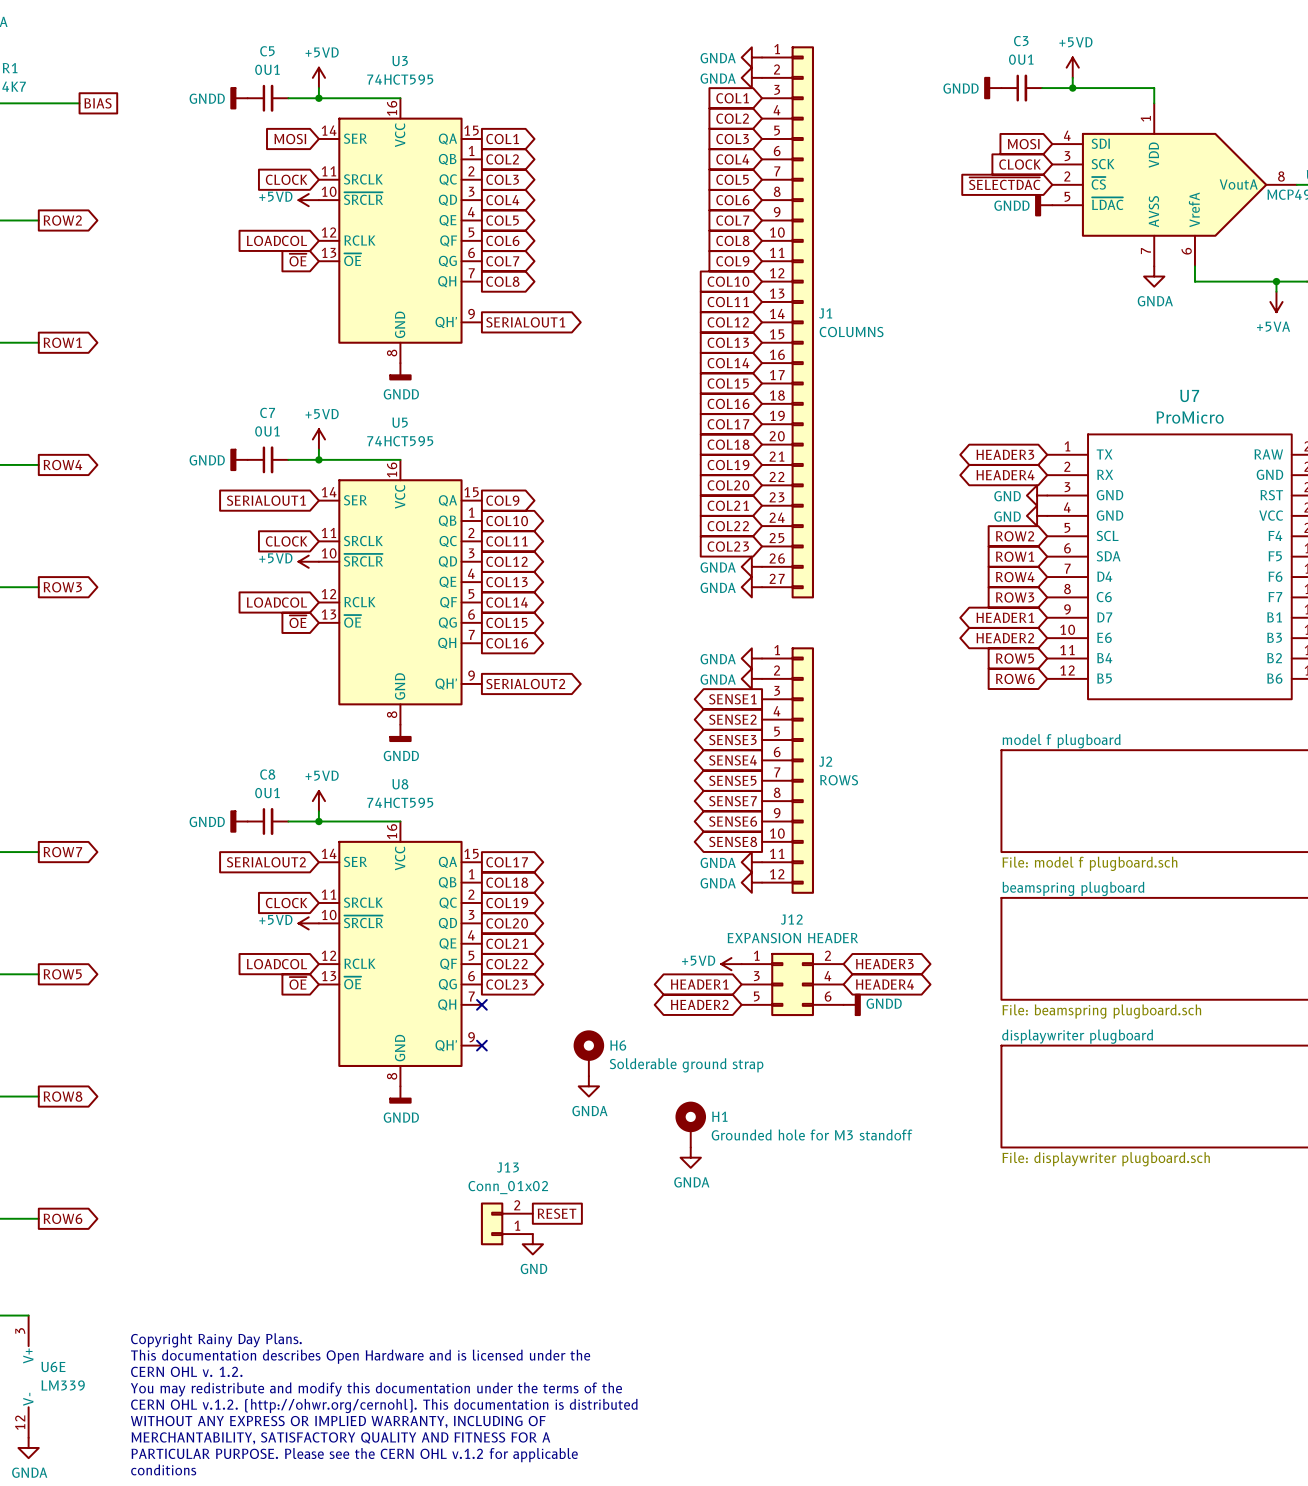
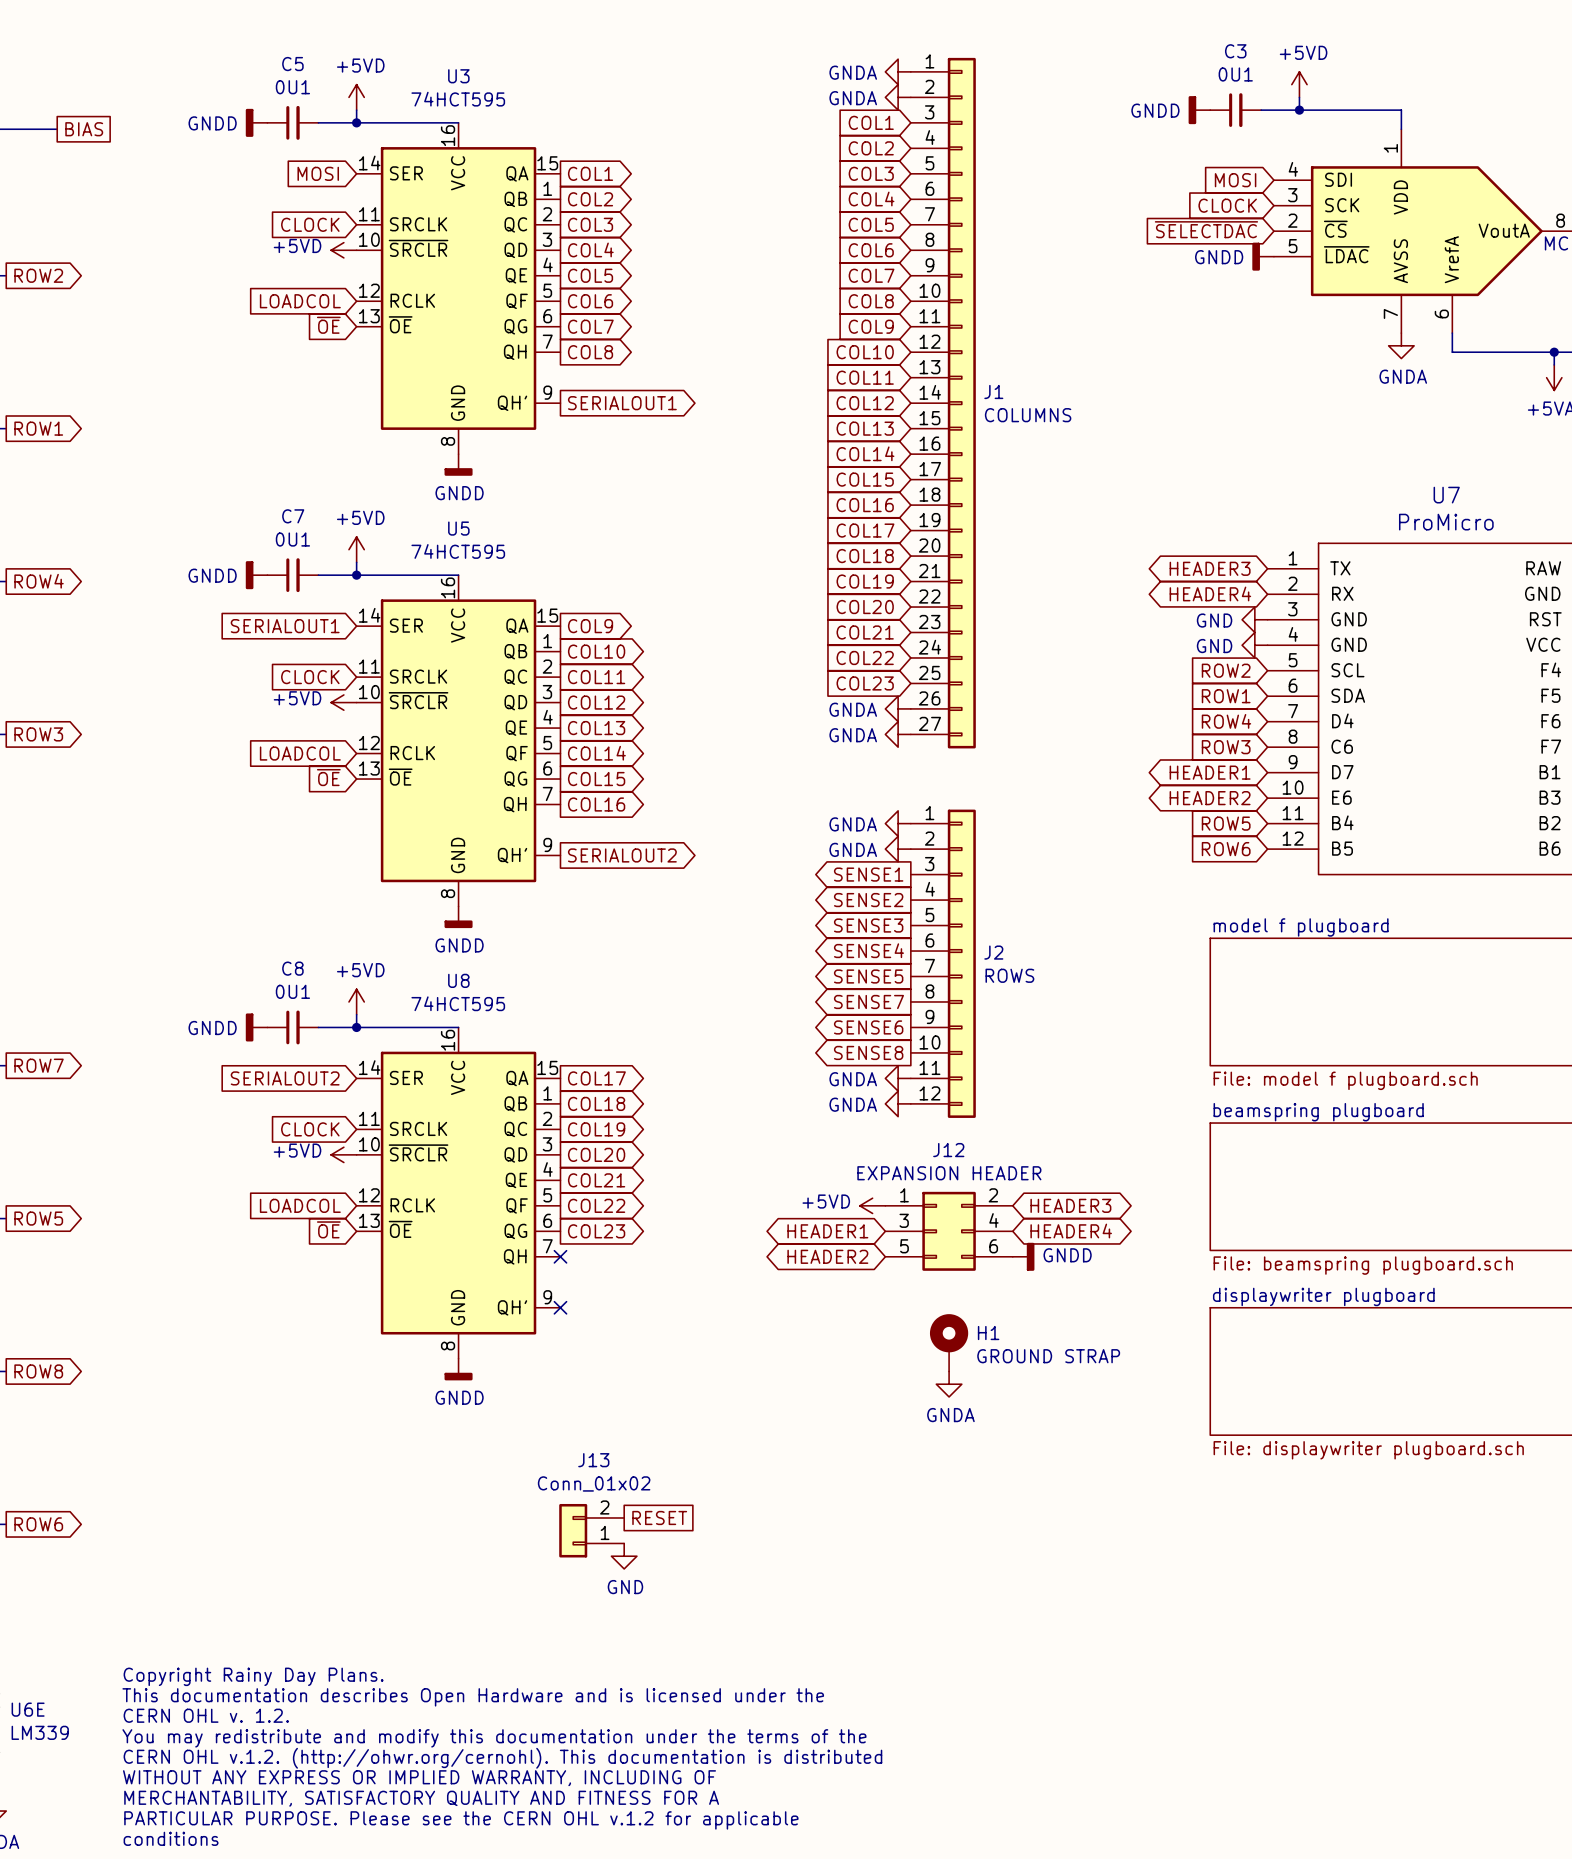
H6: Solderable ground strap (588, 1053) -> none
power symbol: GNDA (588, 1086) -> none
power symbol: none -> GNDA (949, 1384)
H1 position: (690, 1124) -> (949, 1342)
H1 value: Grounded hole for M3 standoff (812, 1135) -> GROUND STRAP (1048, 1356)
power symbol: GNDA (690, 1157) -> none

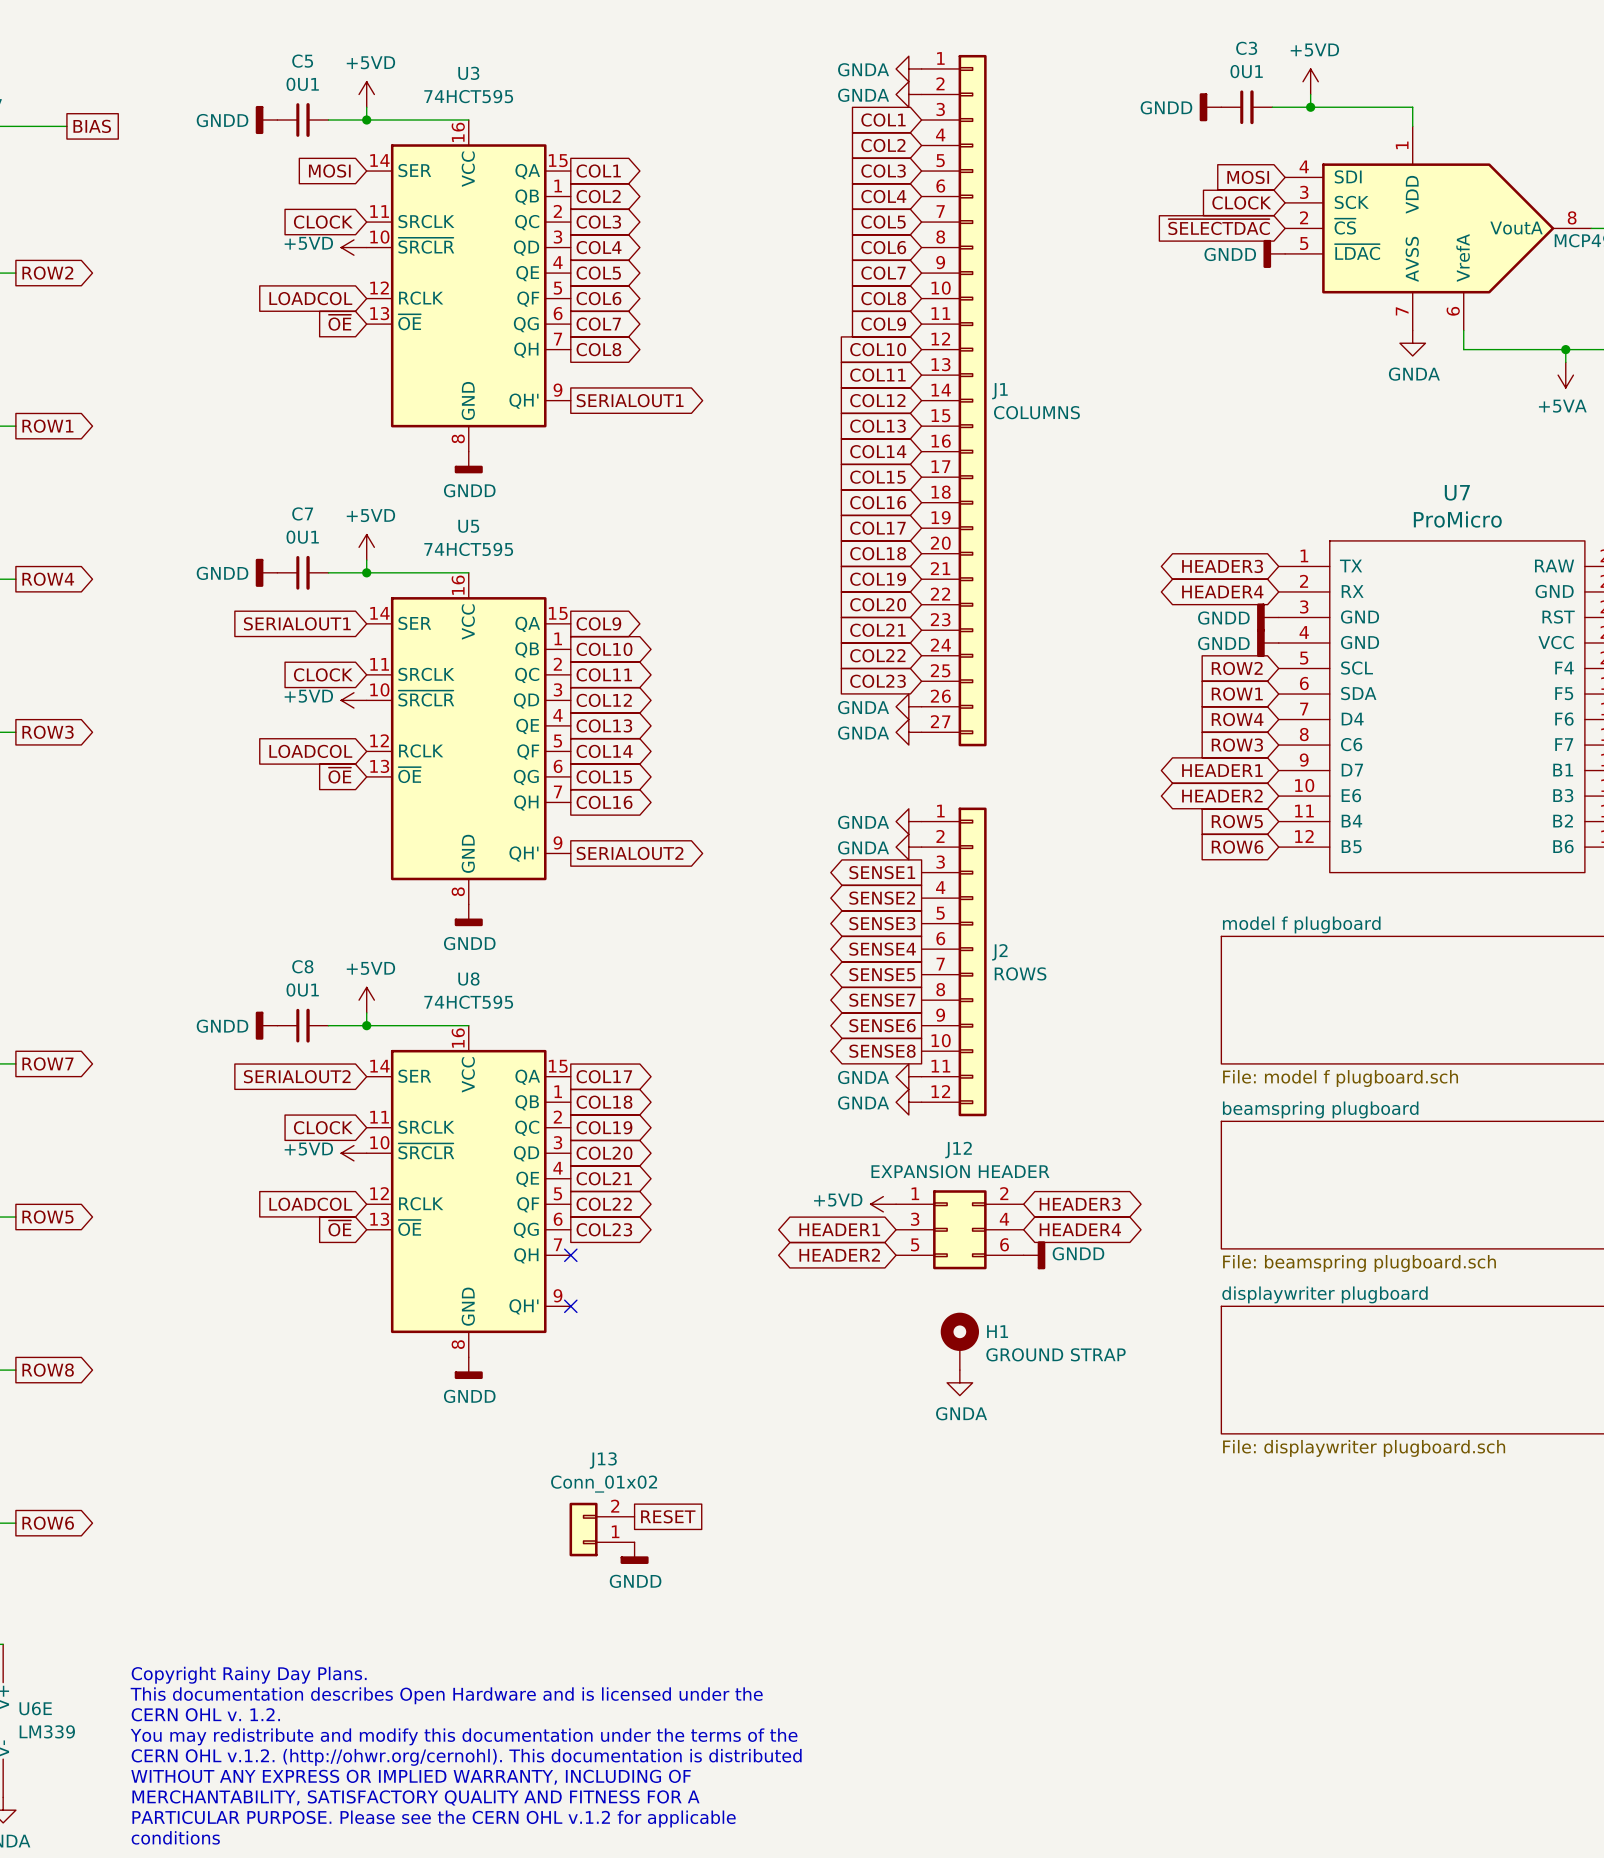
power symbol: GND (1254, 619) -> GNDD (1267, 617)
power symbol: GND (1254, 645) -> GNDD (1267, 642)
power symbol: GND (624, 1556) -> GNDD (634, 1553)

